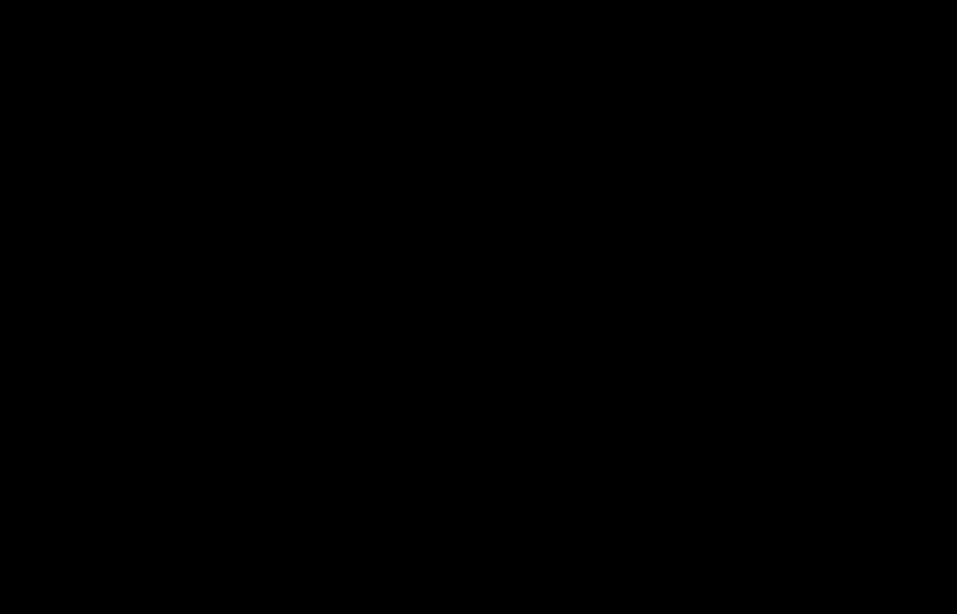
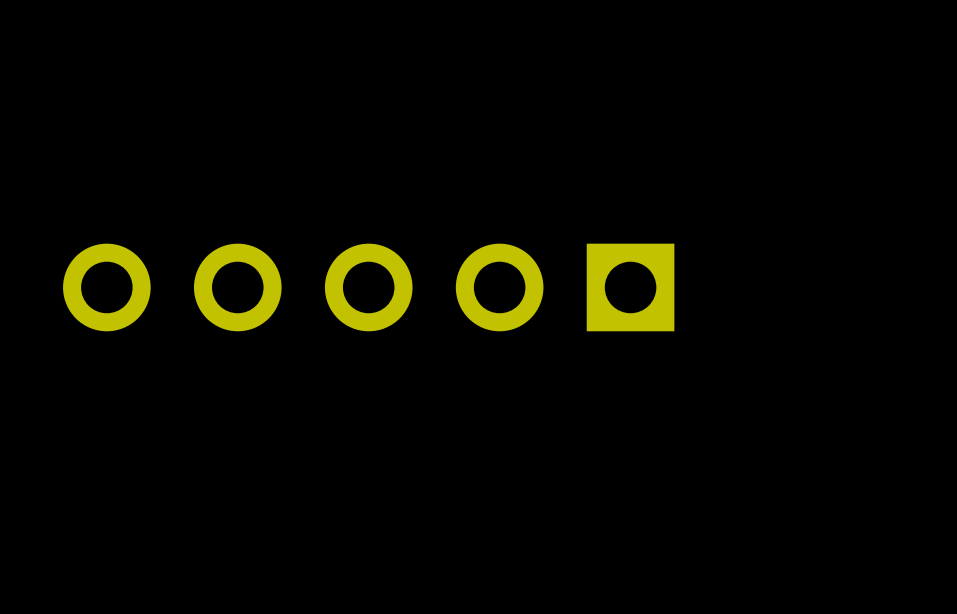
part: none -> (368, 287)

